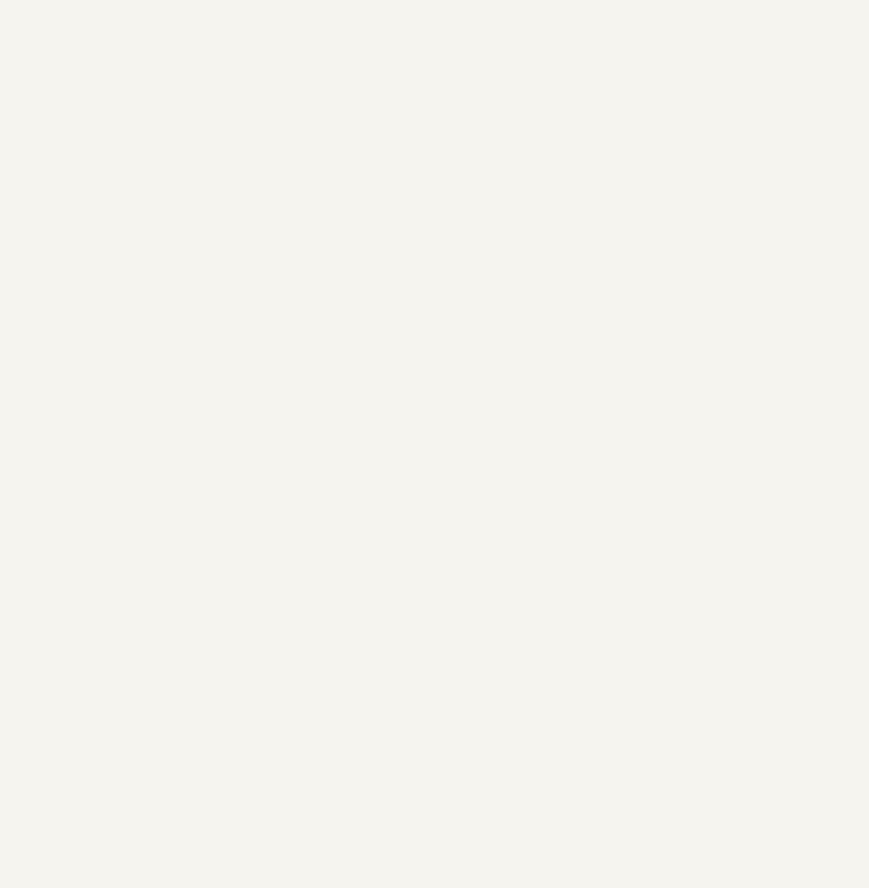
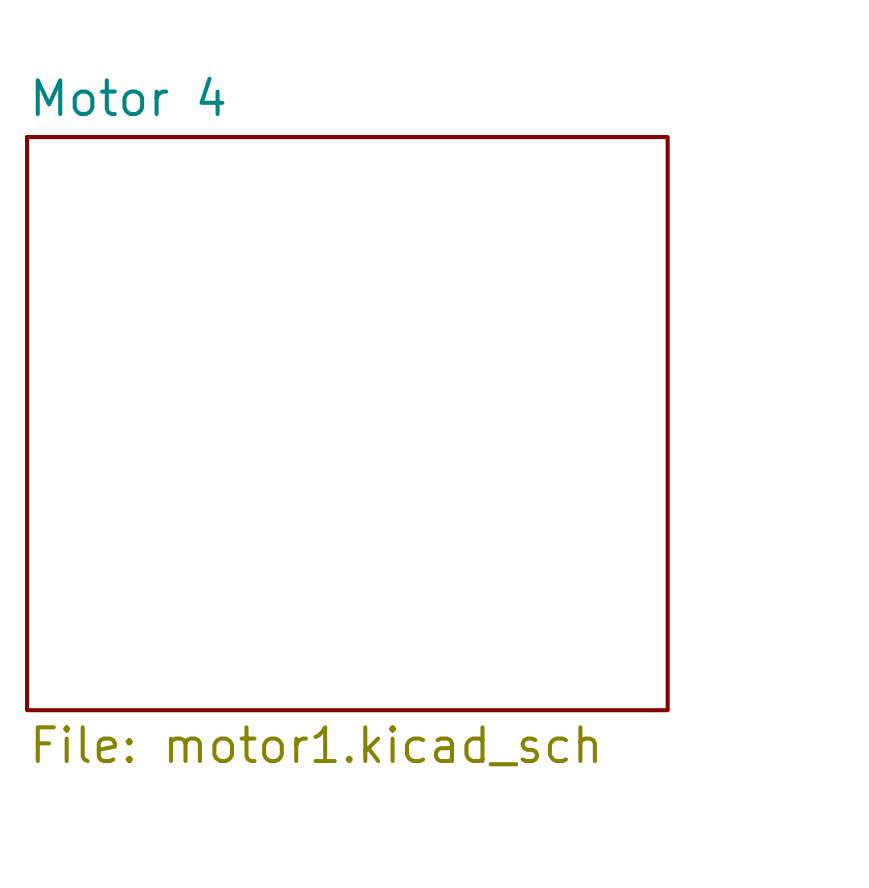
sheet Motor 4: none -> File: motor1.kicad_sch (347, 423)

